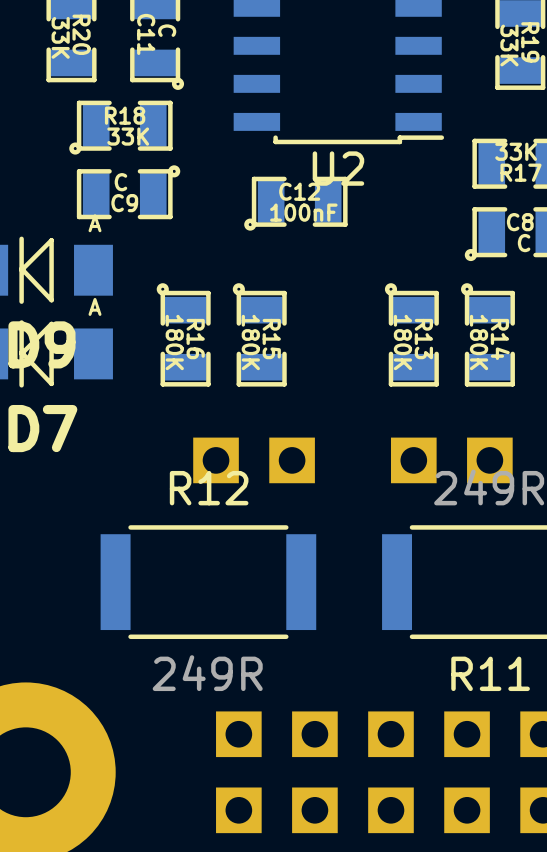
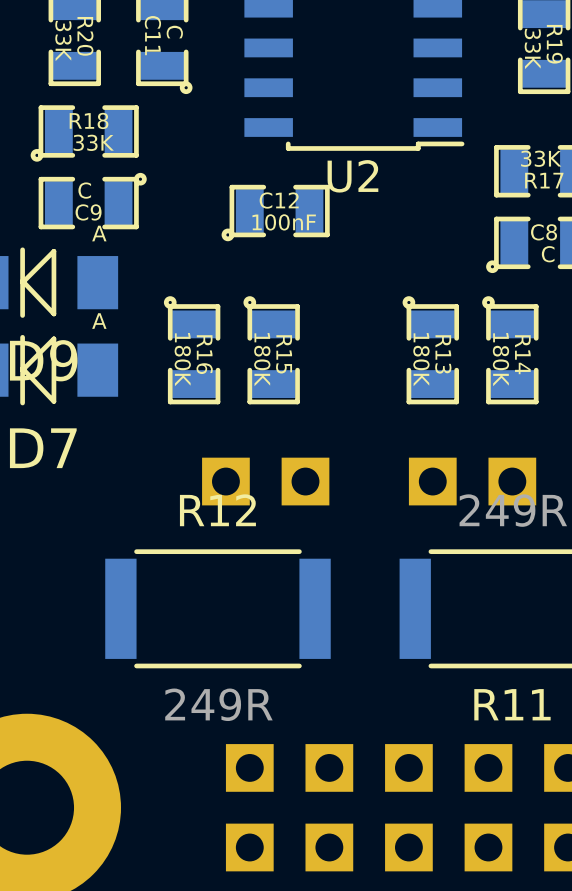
R18 position: (120, 127) -> (84, 133)
C9 position: (128, 192) -> (92, 201)
C12 position: (295, 203) -> (275, 213)

